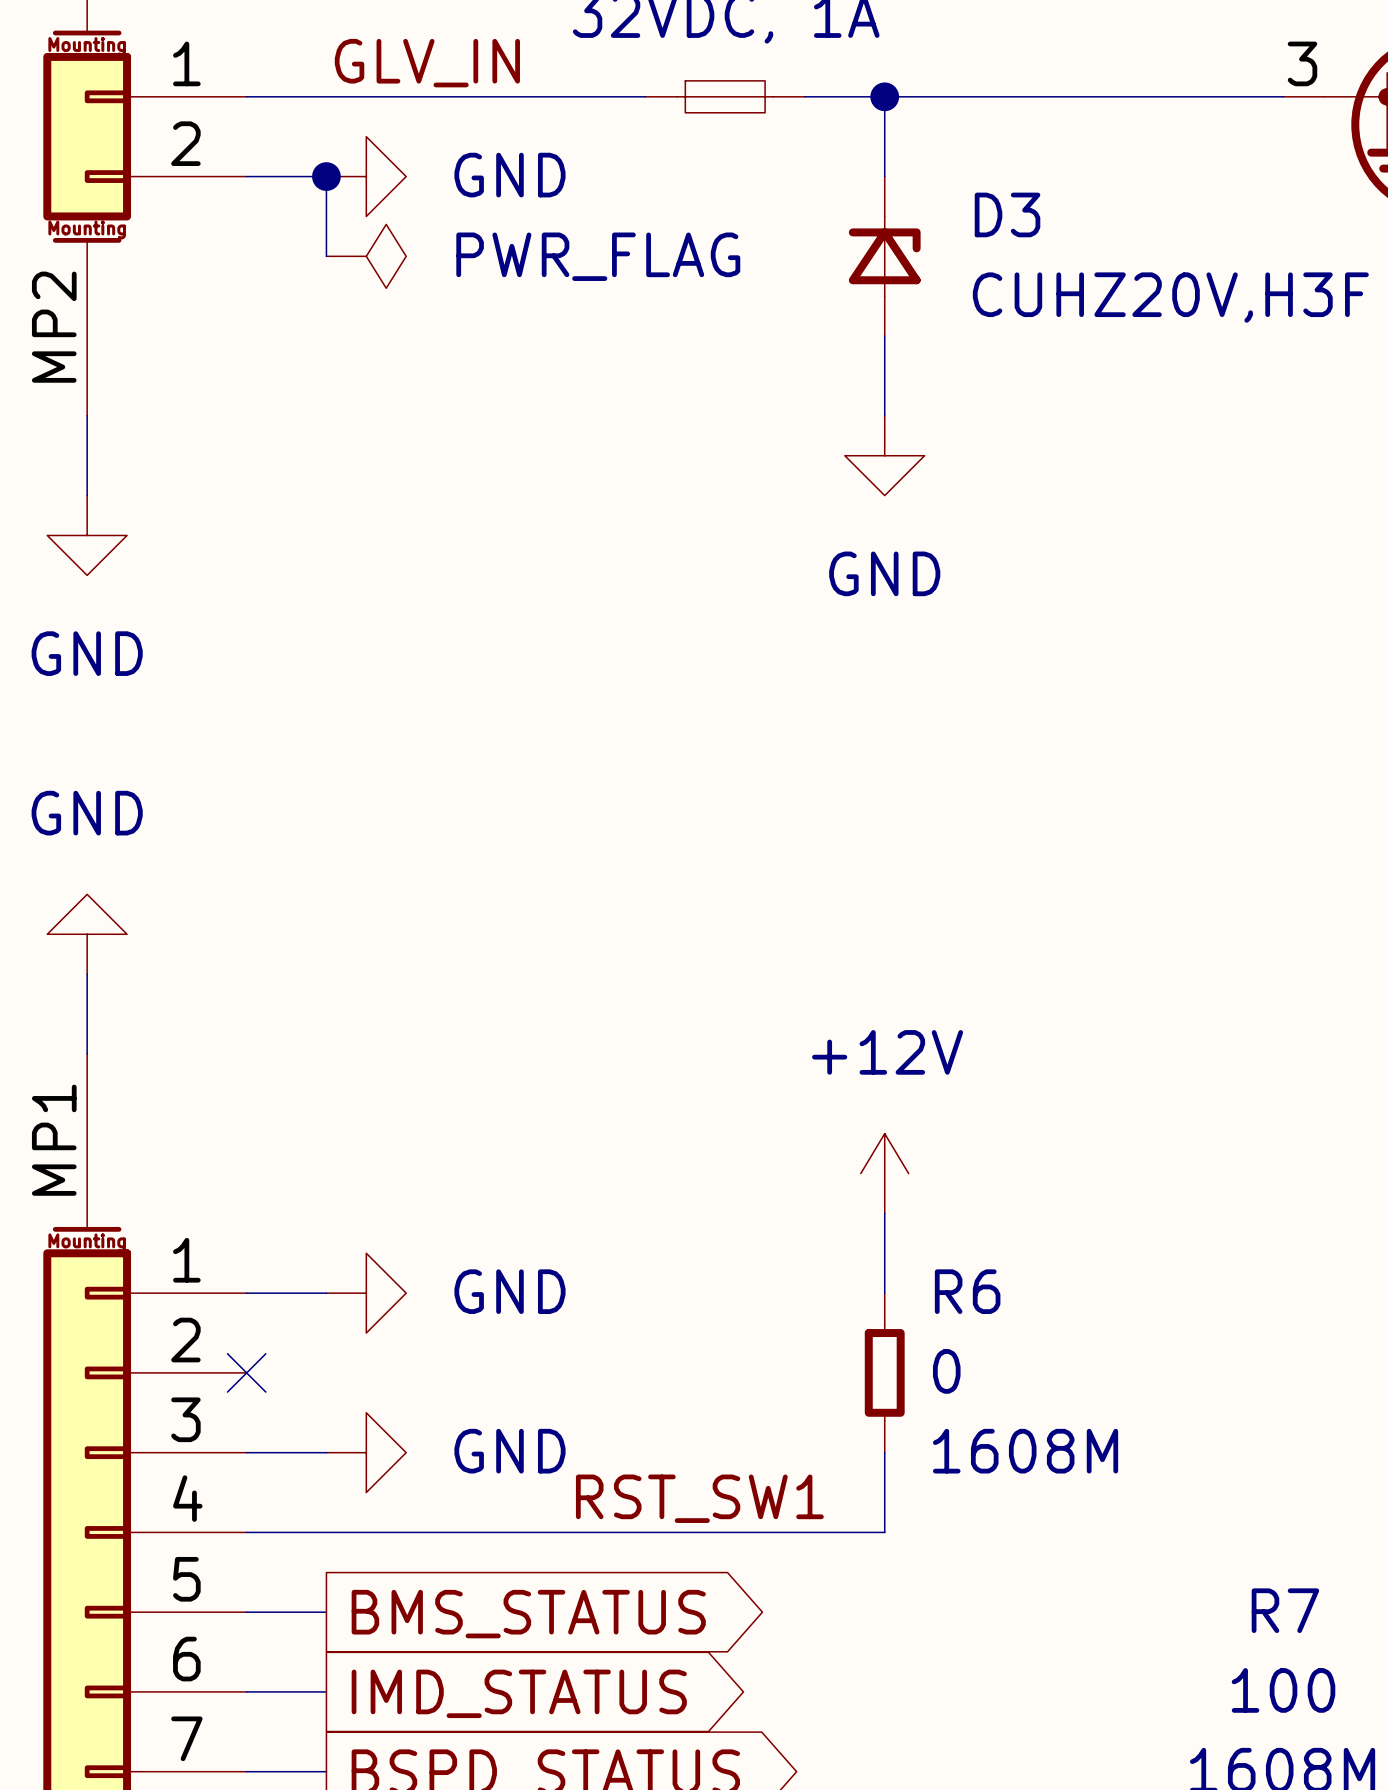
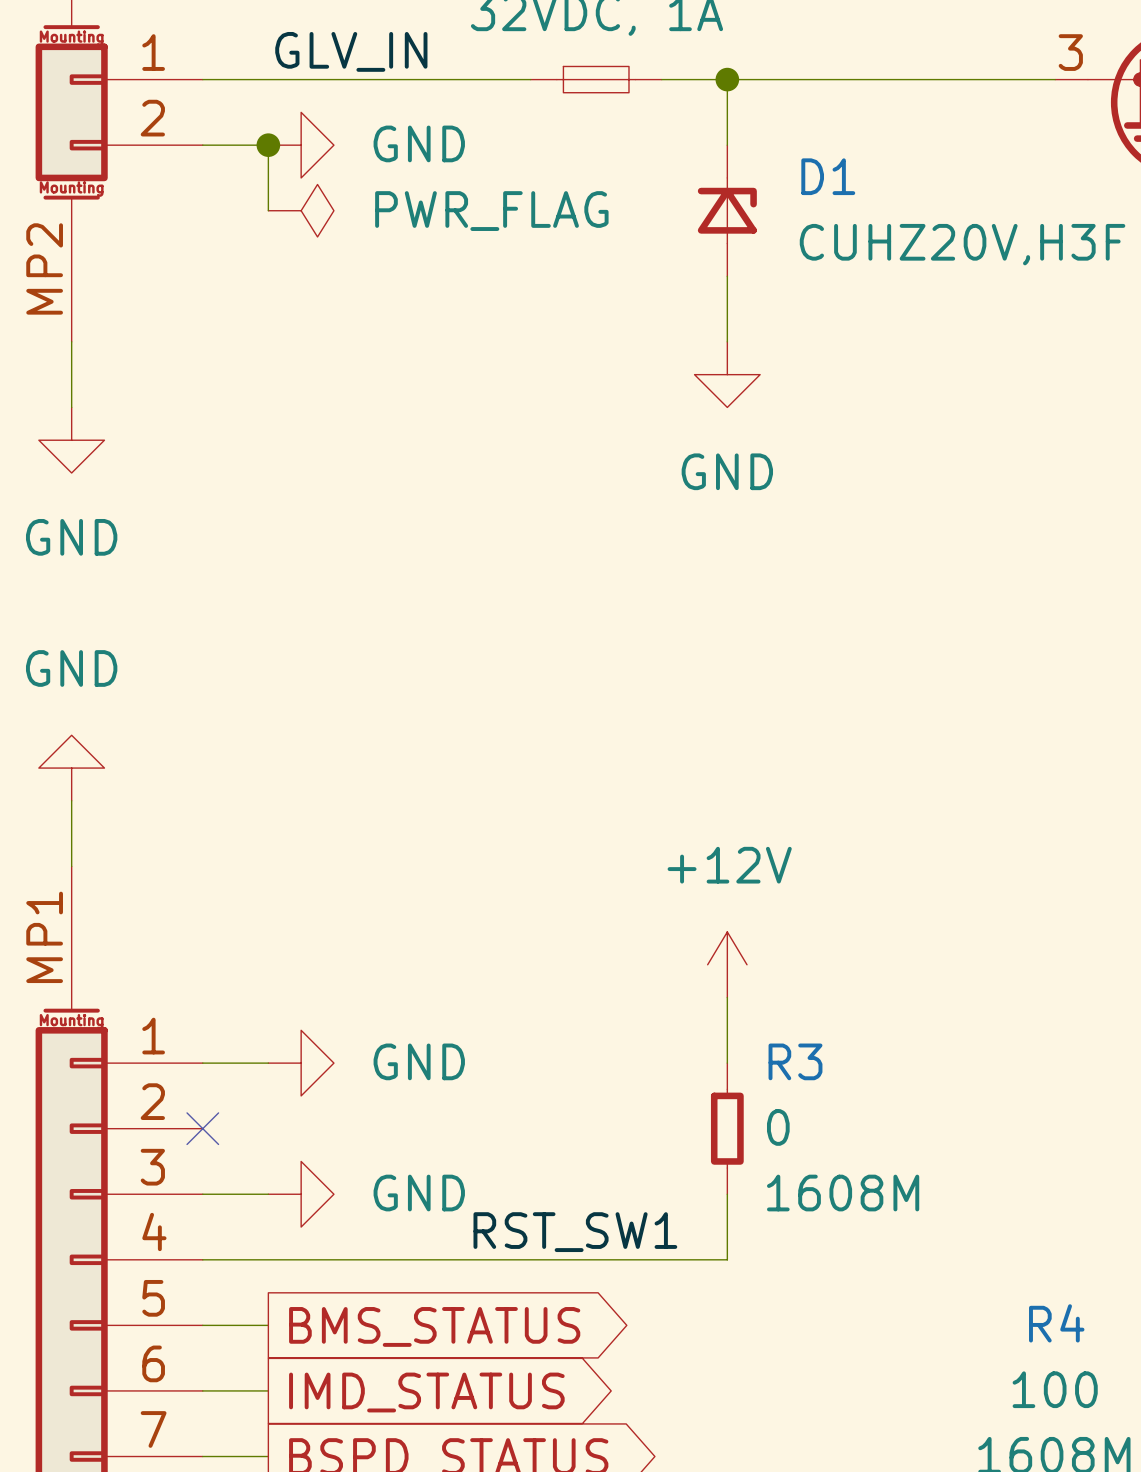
D3 name: D3 (1007, 214) -> D1 (828, 176)
R6 name: R6 (967, 1291) -> R3 (795, 1061)
R7 name: R7 (1285, 1610) -> R4 (1056, 1323)

